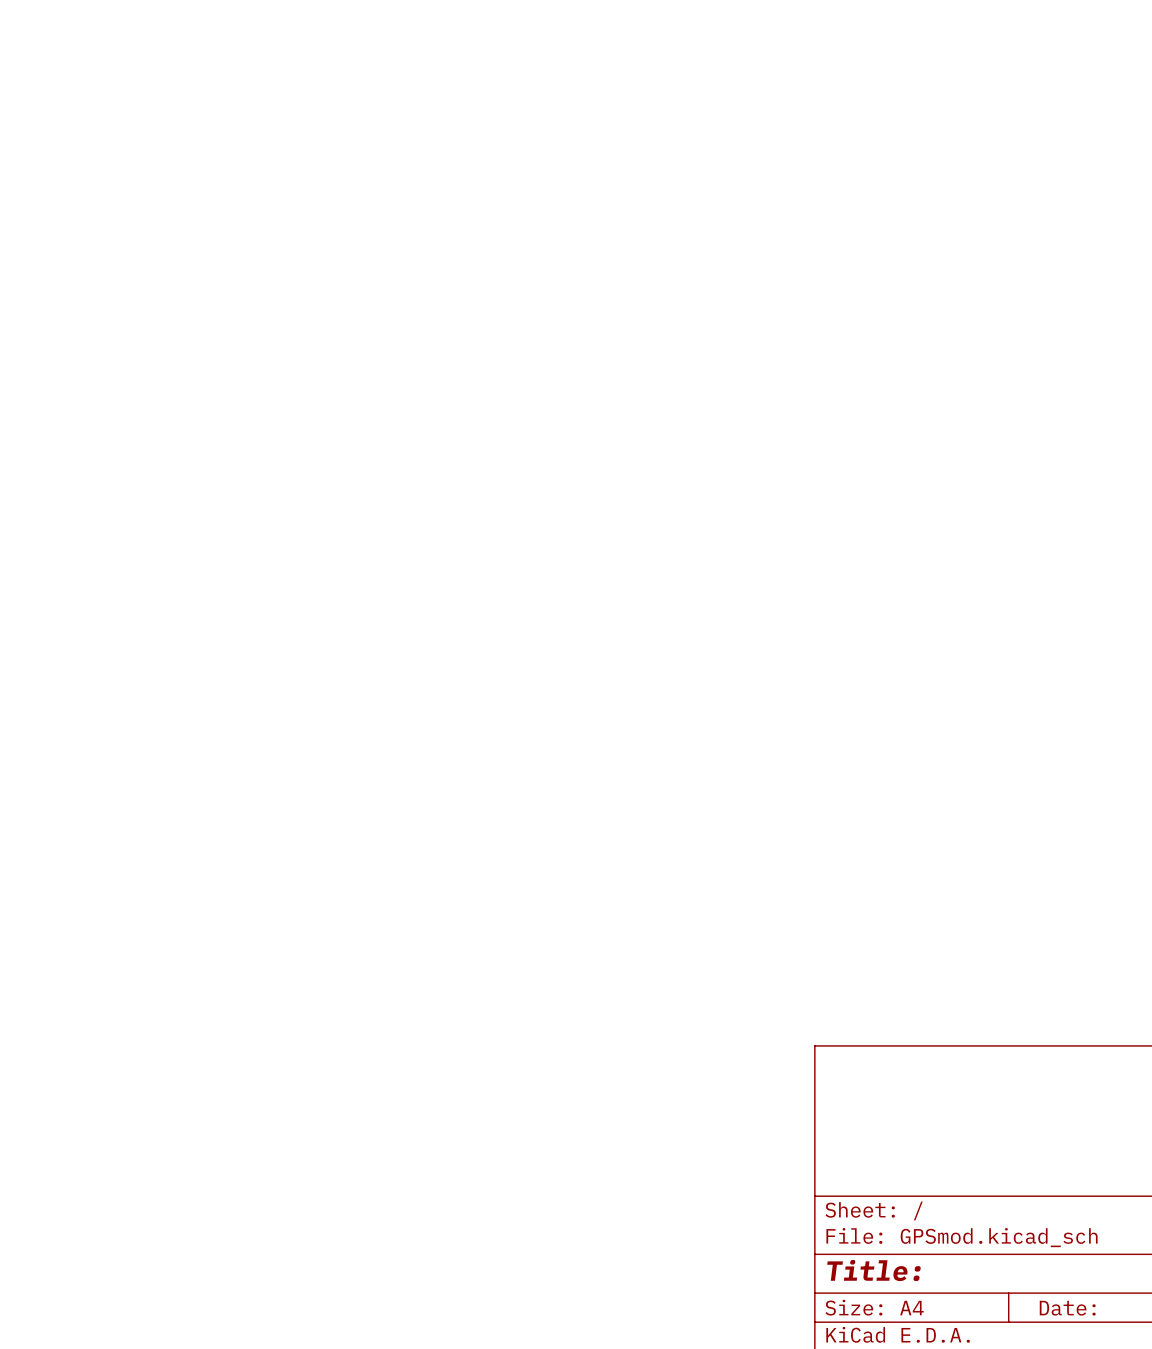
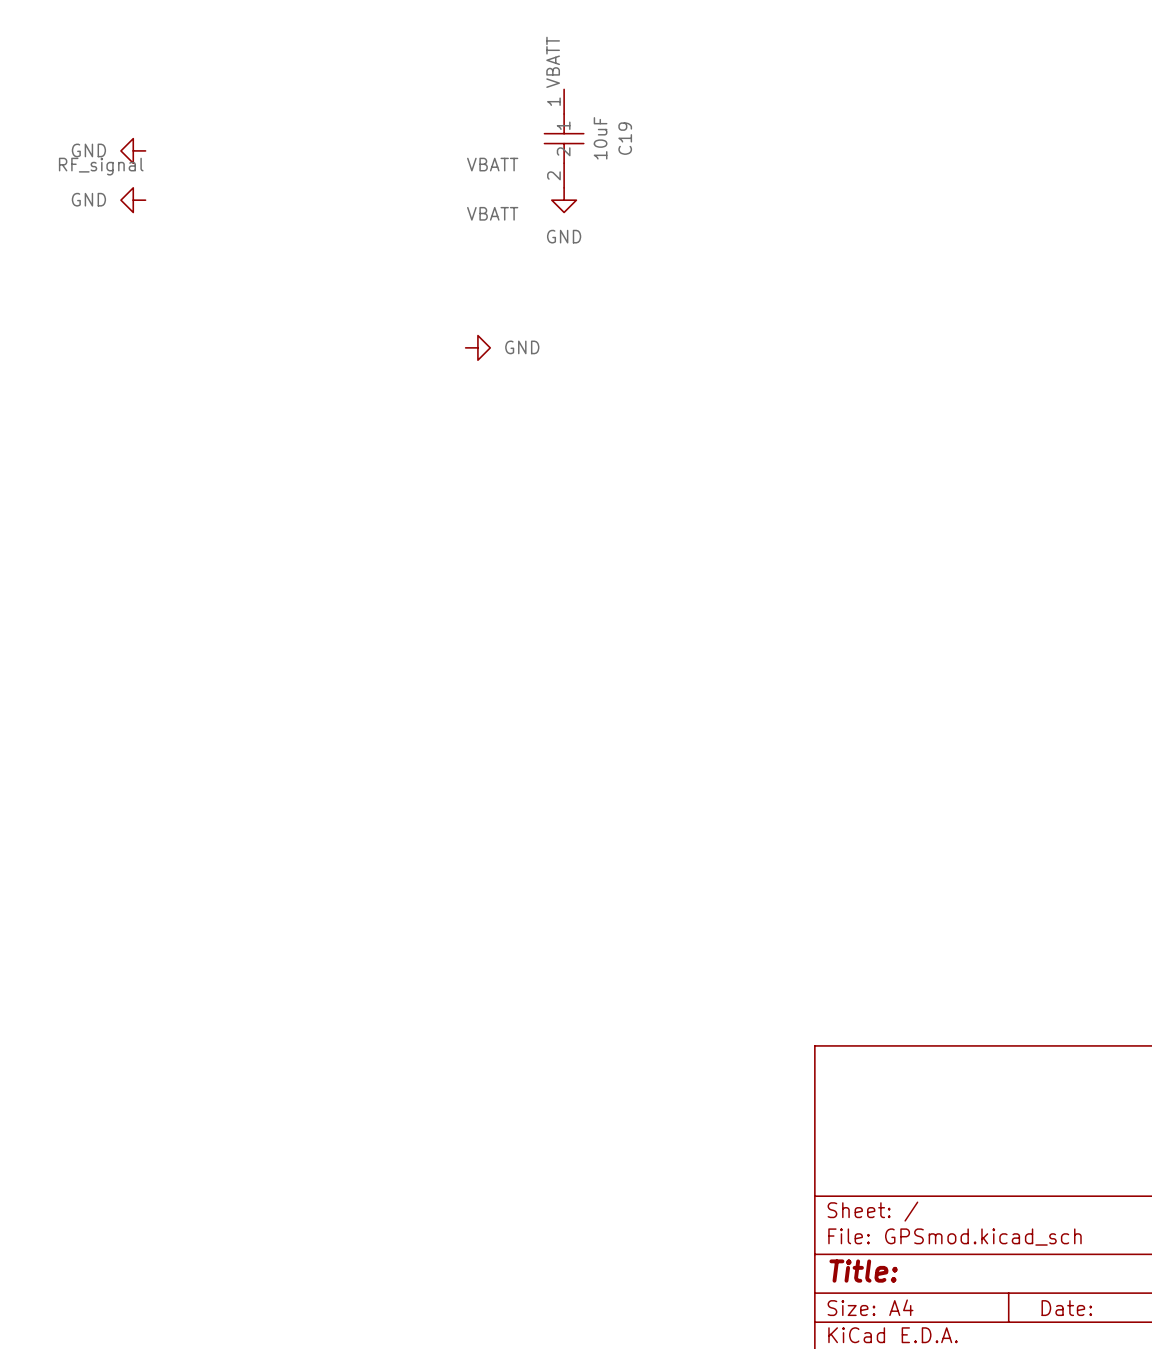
label: none -> VBATT (553, 62)
C19: none -> 10uF (564, 138)
power symbol: none -> GND (133, 150)
label: none -> VBATT (492, 164)
label: none -> RF_signal (101, 166)
power symbol: none -> GND (133, 200)
power symbol: none -> GND (564, 200)
label: none -> VBATT (492, 213)
power symbol: none -> GND (477, 347)

